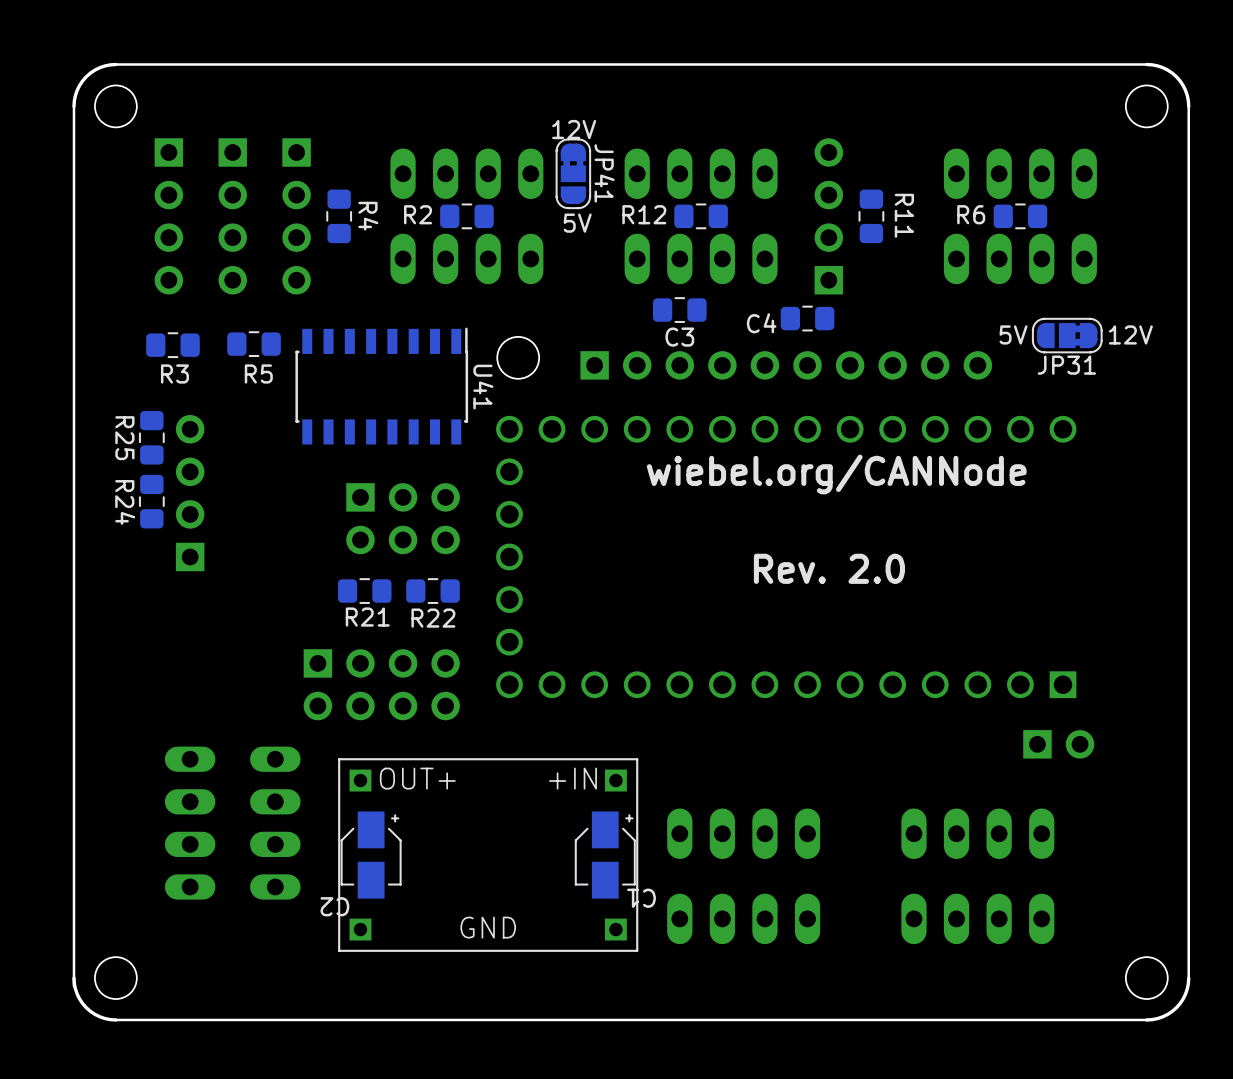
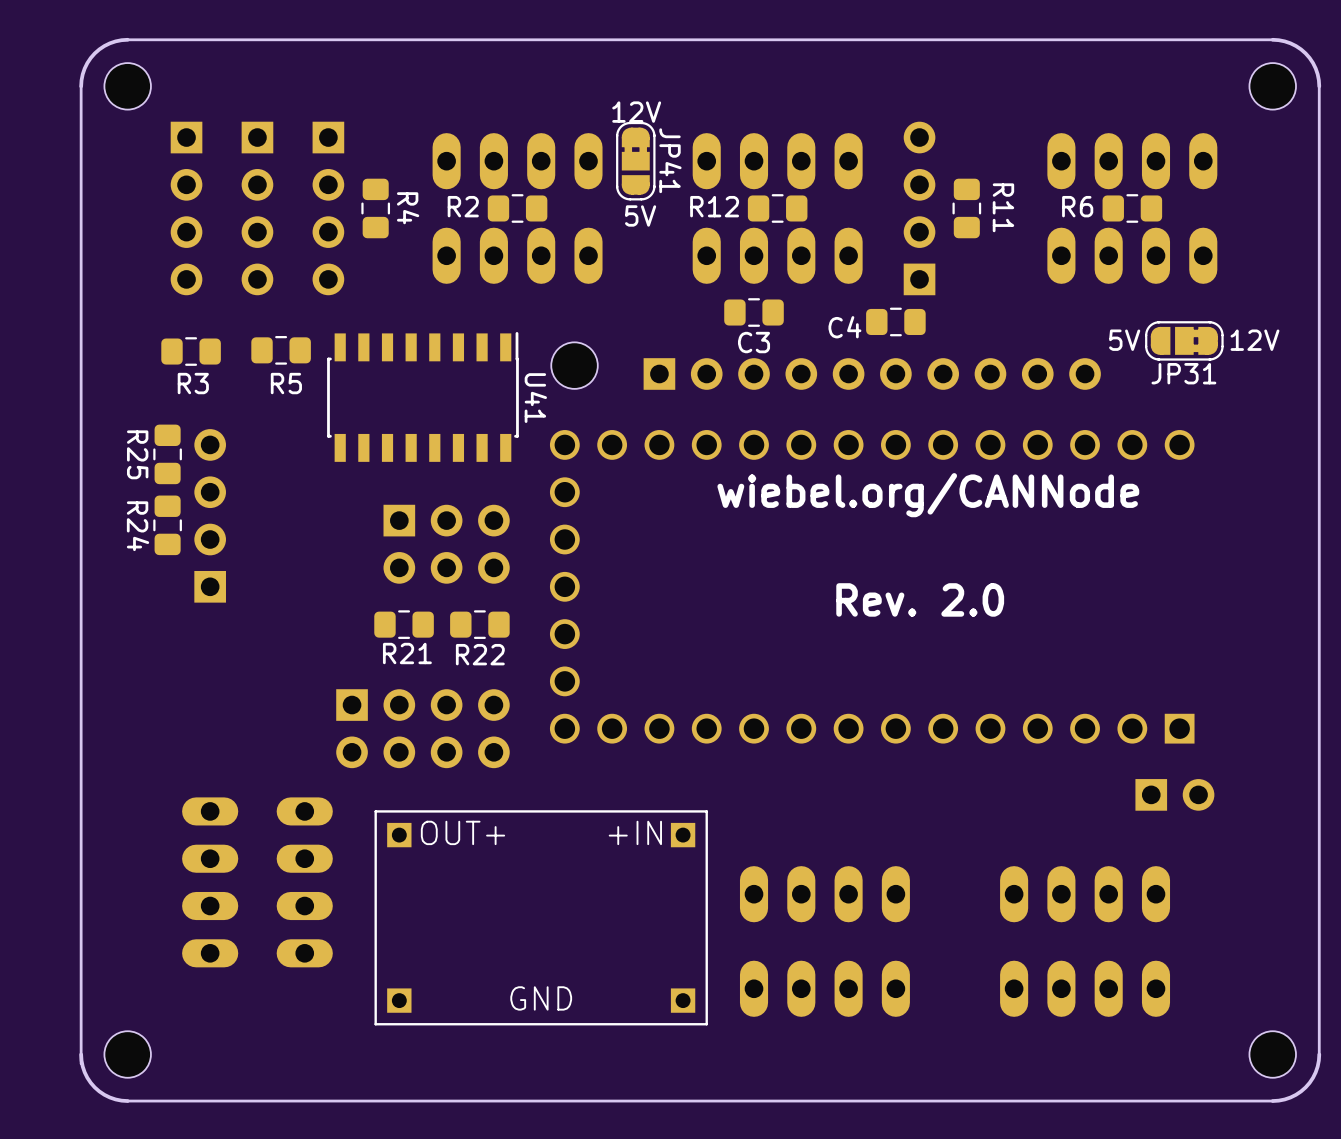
C2: (371, 855) -> none
C1: (605, 855) -> none

